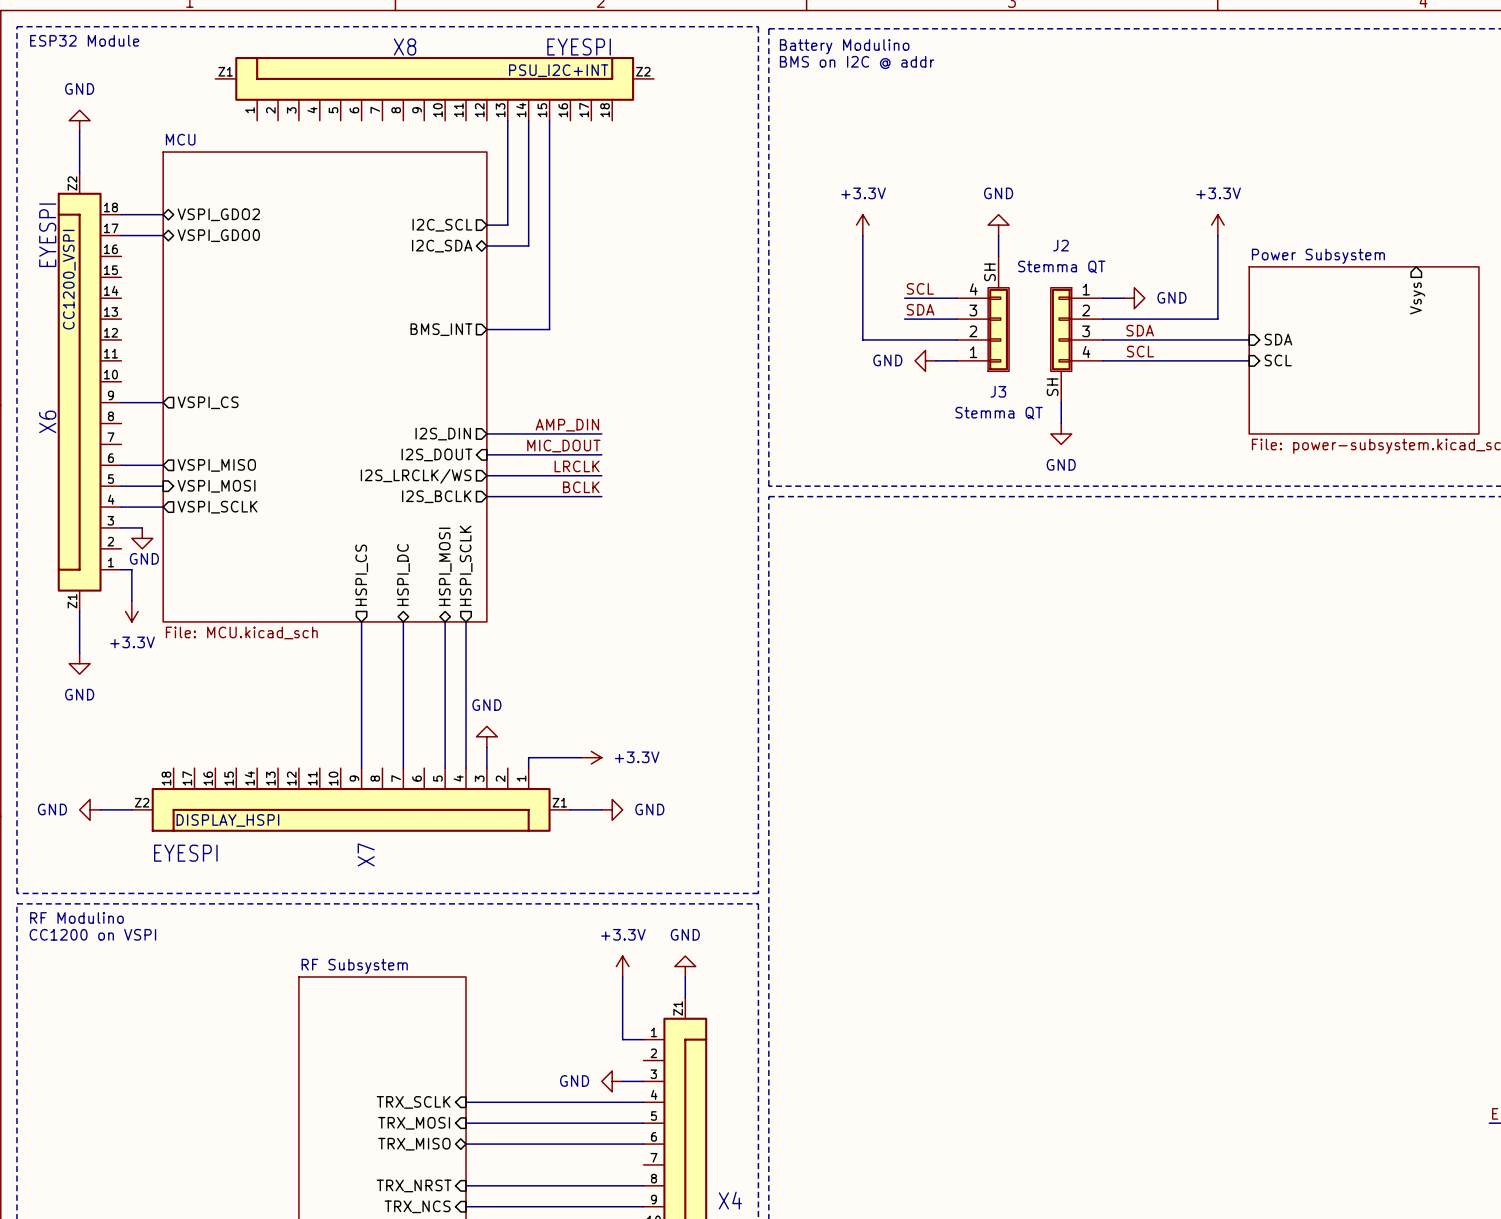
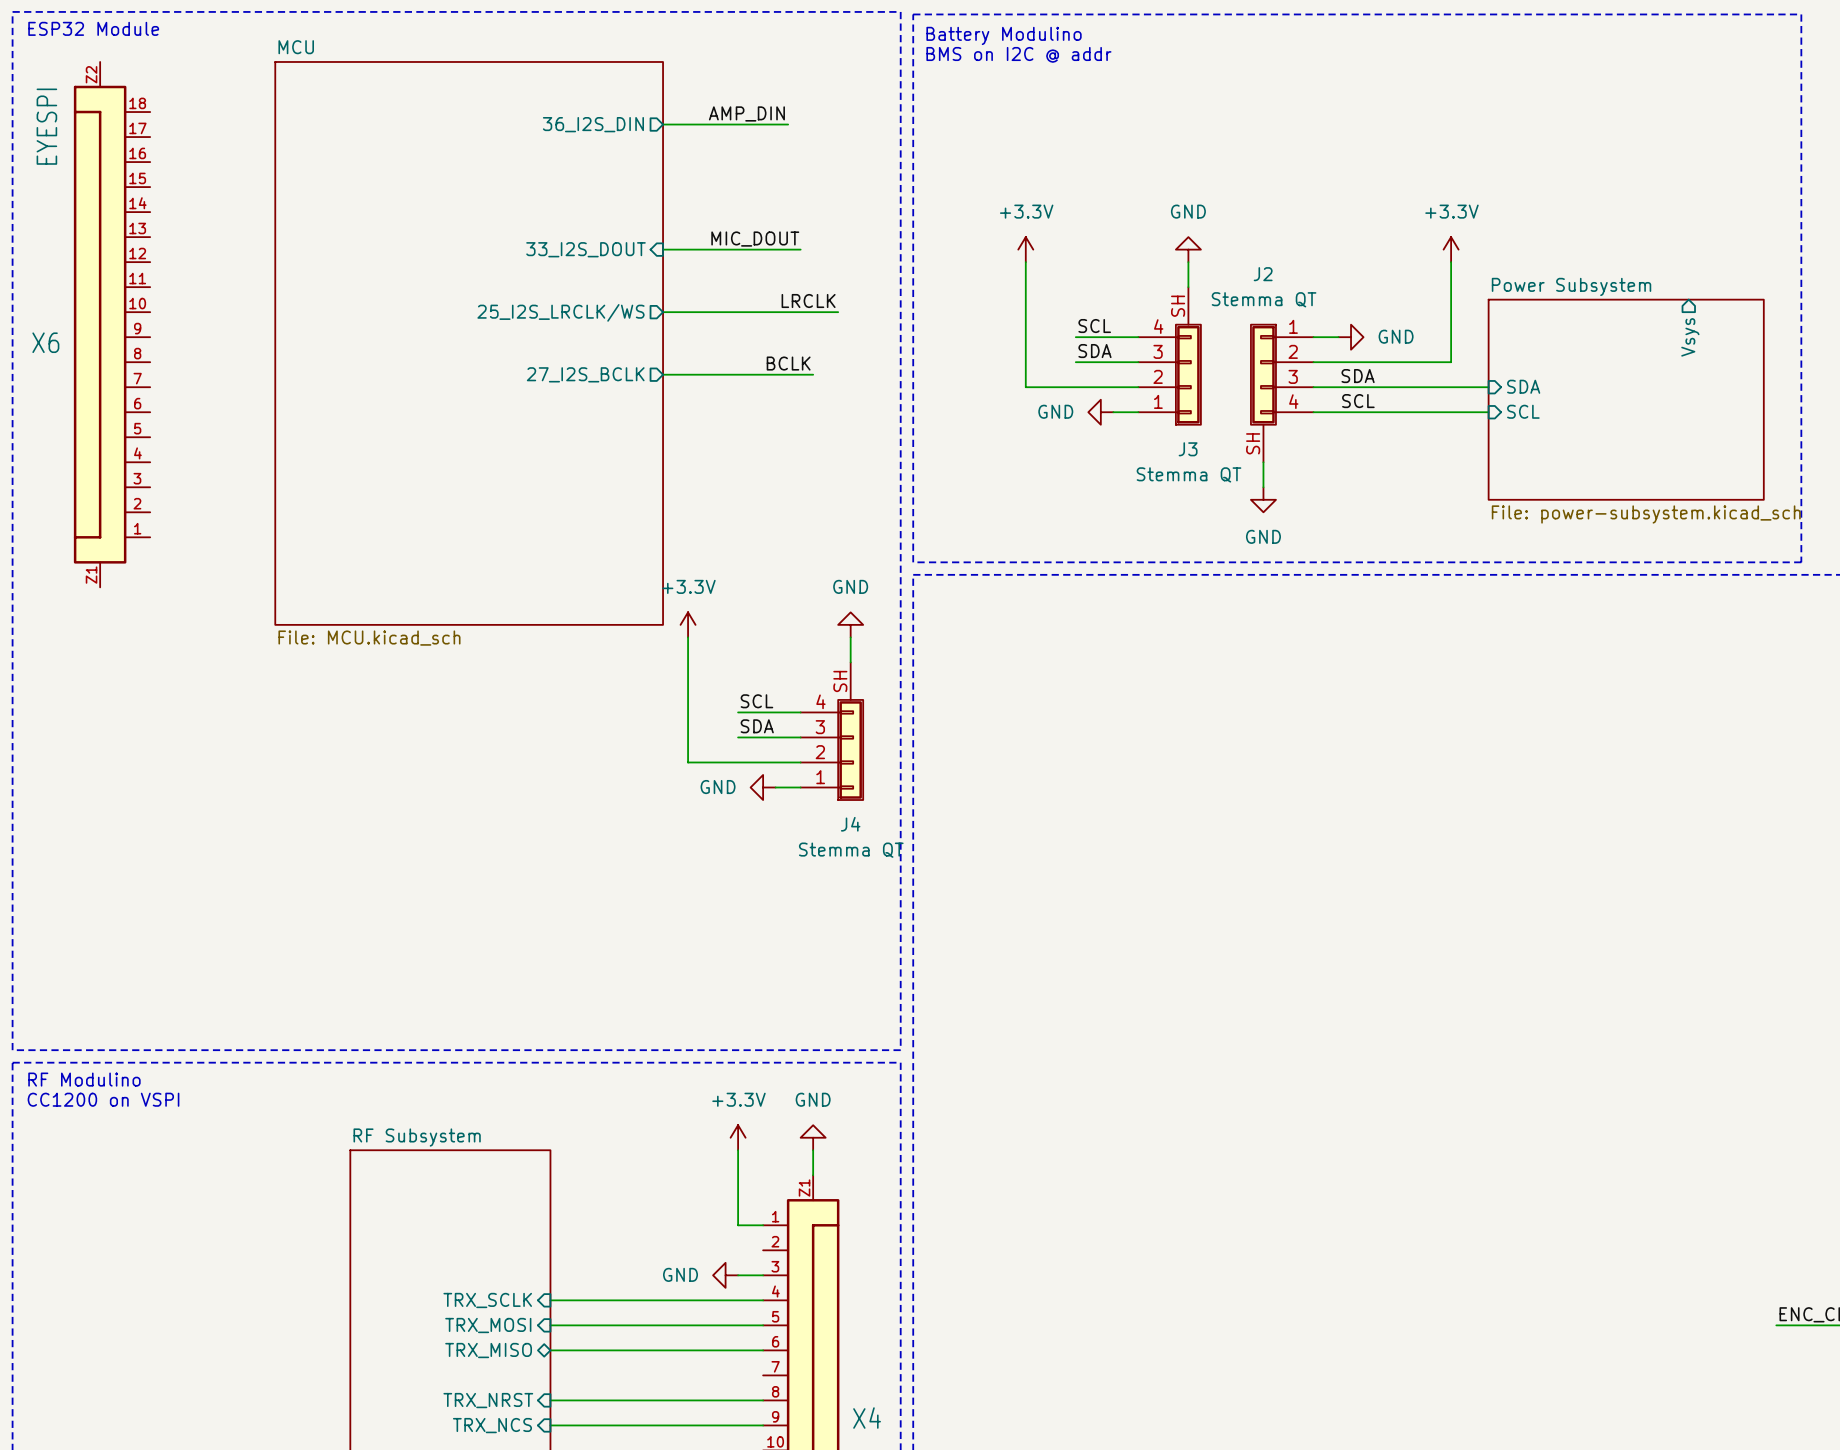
X8: EYESPI (434, 88) -> none
label: none -> AMP_DIN (746, 113)
power symbol: GND (79, 120) -> none
sheet pin: none -> 36_I2S_DIN (593, 124)
wire: (507, 120) (507, 225) (486, 225) -> none
wire: (528, 120) (528, 246) (486, 246) -> none
wire: (549, 120) (549, 329) (486, 329) -> none
wire: none -> (663, 124) (788, 124)
wire: (121, 214) (163, 214) -> none
sheet pin: VSPI_GDO2 (218, 214) -> none
label: none -> MIC_DOUT (755, 239)
sheet pin: I2C_SCL (442, 225) -> none
sheet pin: none -> 33_I2S_DOUT (586, 249)
wire: none -> (663, 249) (800, 249)
X6 value position: EYESPI (47, 235) -> EYESPI (46, 126)
wire: (121, 235) (163, 235) -> none
sheet pin: VSPI_GDO0 (218, 235) -> none
sheet pin: I2C_SDA (442, 246) -> none
label: none -> LRCLK (808, 301)
sheet pin: none -> 25_I2S_LRCLK/WS (560, 312)
wire: none -> (663, 312) (838, 312)
X6 text: CC1200_VSPI (69, 279) -> none
sheet pin: BMS_INT (441, 329) -> none
sheet pin: none -> 27_I2S_BCLK (585, 374)
wire: none -> (663, 374) (813, 374)
sheet MCU position: (325, 386) -> (469, 343)
X6 position: (89, 392) -> (112, 324)
wire: (121, 402) (163, 402) -> none
sheet pin: VSPI_CS (208, 402) -> none
X6 name rotation: 0° (47, 421) -> 90° clockwise (45, 342)
label: AMP_DIN (567, 425) -> none
wire: (486, 433) (601, 433) -> none
sheet pin: I2S_DIN (443, 434) -> none
label: MIC_DOUT (563, 446) -> none
sheet pin: I2S_DOUT (437, 454) -> none
wire: (486, 454) (601, 454) -> none
wire: (121, 465) (163, 465) -> none
sheet pin: VSPI_MISO (216, 465) -> none
label: LRCLK (577, 466) -> none
wire: (486, 475) (601, 475) -> none
sheet pin: I2S_LRCLK/WS (416, 476) -> none
wire: (121, 486) (163, 486) -> none
sheet pin: VSPI_MOSI (216, 486) -> none
label position: BCLK (581, 487) -> BCLK (788, 363)
sheet pin: I2S_BCLK (436, 496) -> none
wire: (486, 496) (601, 496) -> none
wire: (121, 507) (163, 507) -> none
sheet pin: VSPI_SCLK (217, 507) -> none
wire: (121, 527) (142, 527) -> none
power symbol: GND (142, 538) -> none
power symbol: none -> +3.3V (688, 624)
power symbol: none -> GND (850, 624)
wire: none -> (688, 637) (688, 762) (800, 762)
wire: none -> (850, 637) (850, 662)
sheet pin: HSPI_SCLK (466, 565) -> none
sheet pin: HSPI_MOSI (445, 566) -> none
wire: (121, 569) (131, 569) (131, 601) -> none
sheet pin: HSPI_CS (361, 575) -> none
sheet pin: HSPI_DC (403, 575) -> none
label: none -> SCL (756, 701)
wire: (79, 611) (79, 653) -> none
power symbol: +3.3V (131, 611) -> none
wire: none -> (738, 712) (800, 712)
wire: (361, 621) (361, 768) -> none
wire: (403, 621) (403, 768) -> none
wire: (445, 621) (445, 768) -> none
wire: (466, 621) (466, 768) -> none
label: none -> SDA (757, 726)
J4: none -> Stemma QT (832, 731)
wire: none -> (738, 737) (800, 737)
power symbol: GND (79, 663) -> none
power symbol: none -> GND (763, 787)
wire: none -> (775, 787) (800, 787)
power symbol: GND (486, 736) -> none
wire: (486, 747) (486, 768) -> none
wire: (580, 757) (528, 757) (528, 768) -> none
power symbol: +3.3V (591, 757) -> none
X7: EYESPI (351, 799) -> none
power symbol: GND (90, 809) -> none
wire: (100, 809) (131, 809) -> none
wire: (570, 809) (601, 809) -> none
power symbol: GND (612, 809) -> none

